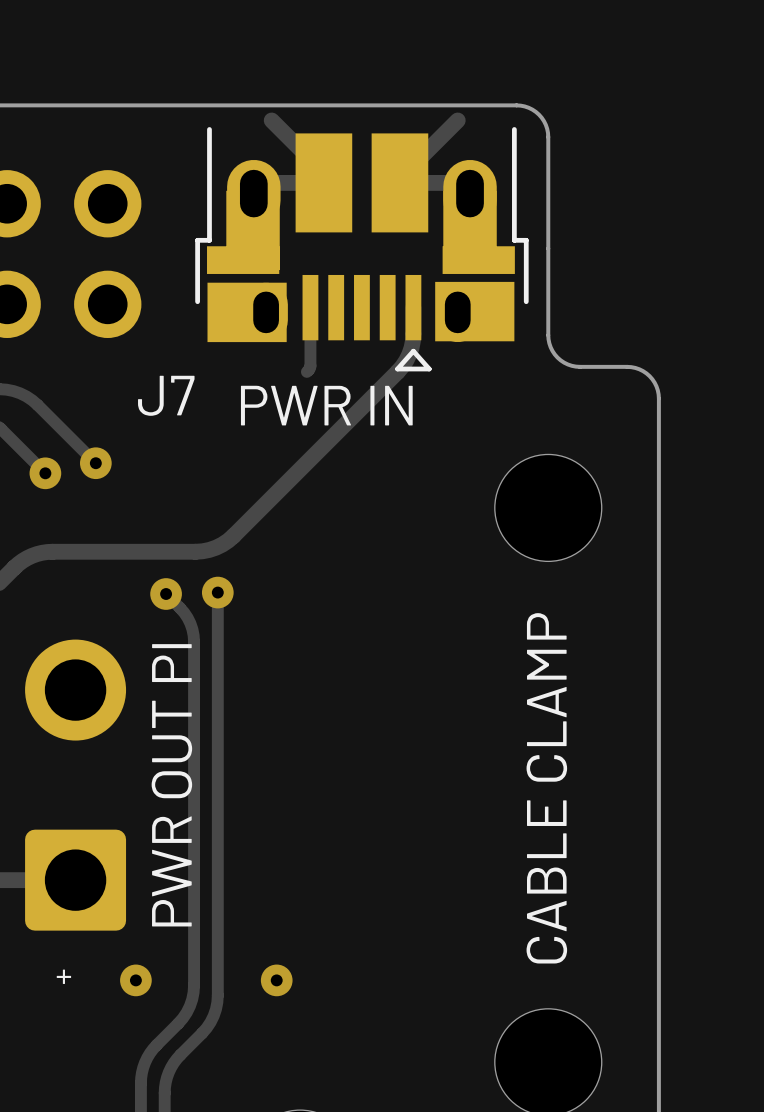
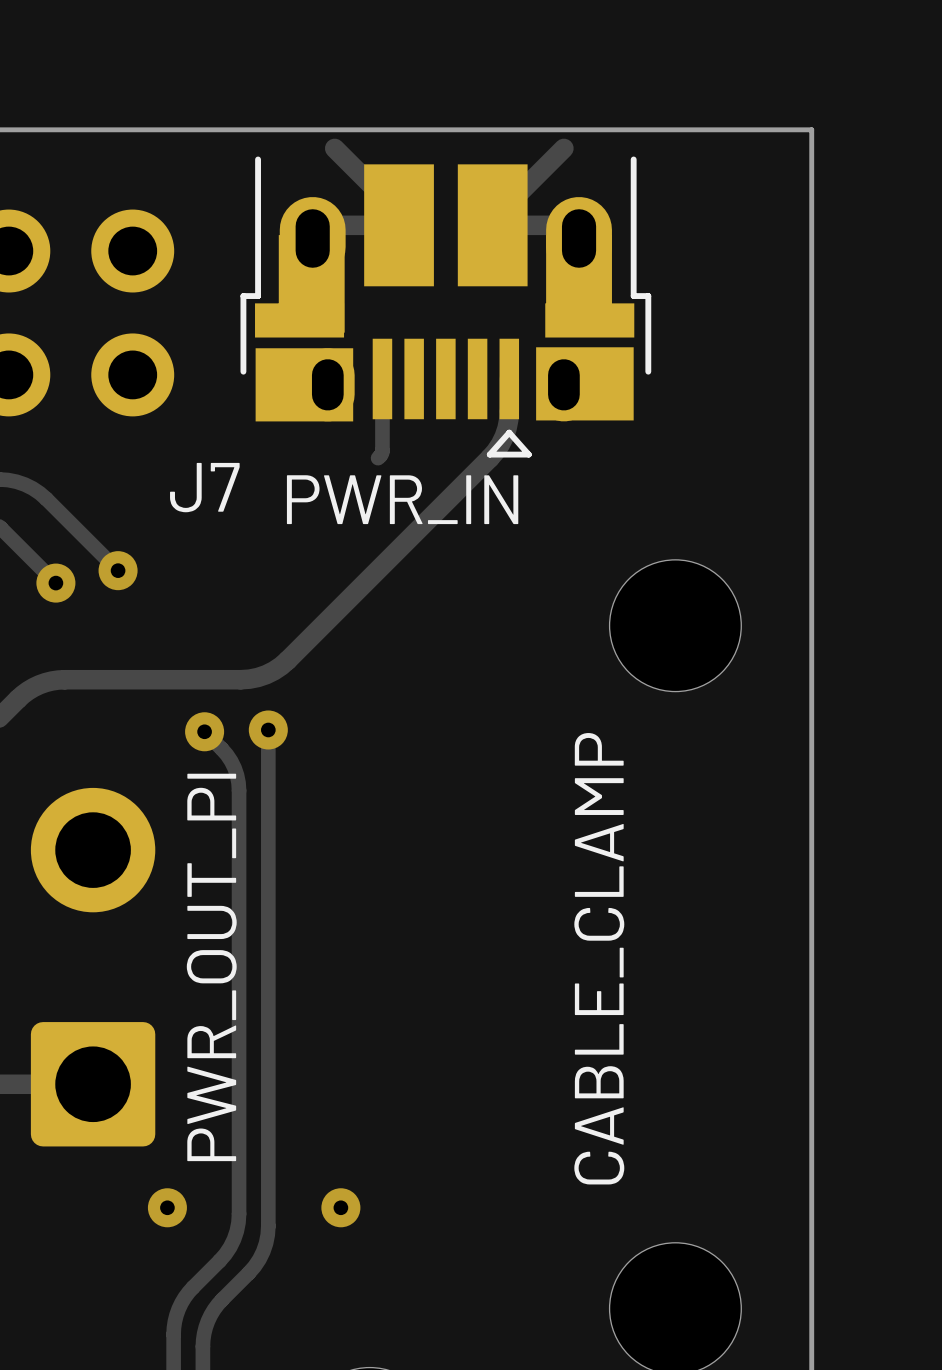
board edge: (516, 105) (528, 107) (535, 111) (544, 121) (548, 132) (548, 335) (550, 347) (560, 360) (571, 365) (627, 366) (639, 369) (649, 376) (654, 382) (658, 398) -> (636, 129) (811, 129) (811, 490)
J7 value: PWR IN (326, 405) -> PWR_IN (402, 499)
part value: PWR OUT PI (171, 785) -> PWR_OUT_PI (211, 967)
part value: CABLE CLAMP (546, 788) -> CABLE_CLAMP (599, 958)
text: + (63, 976) -> none

